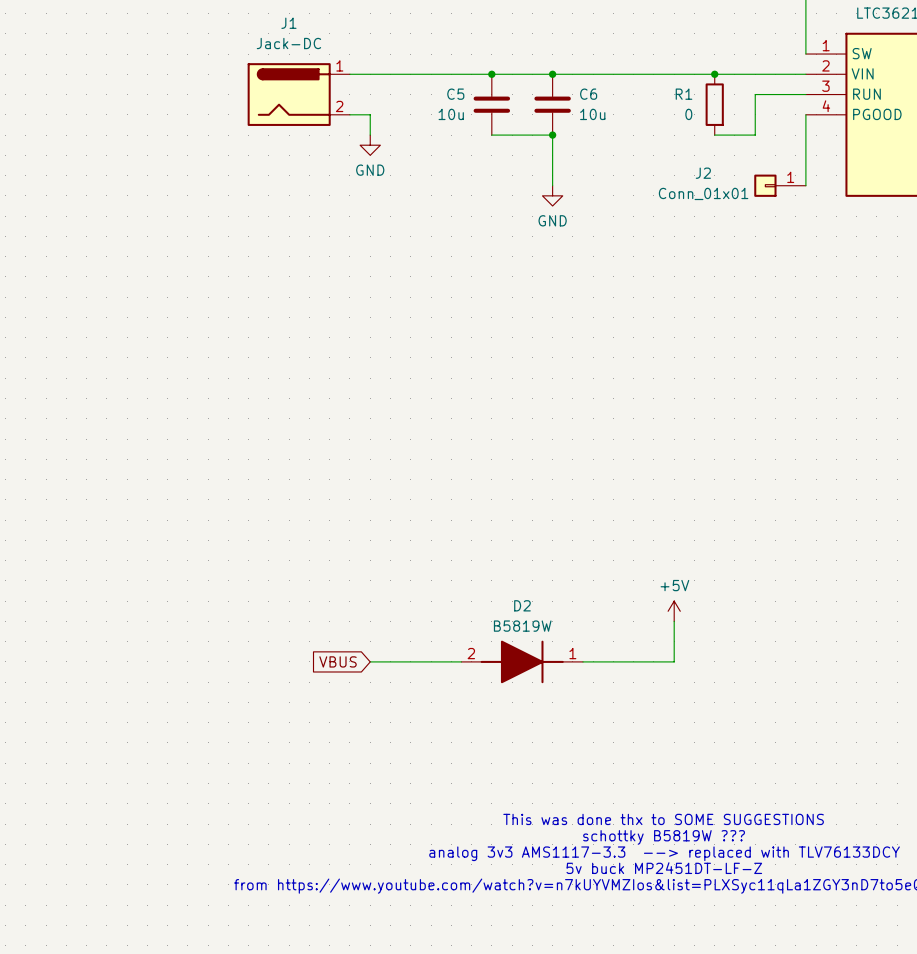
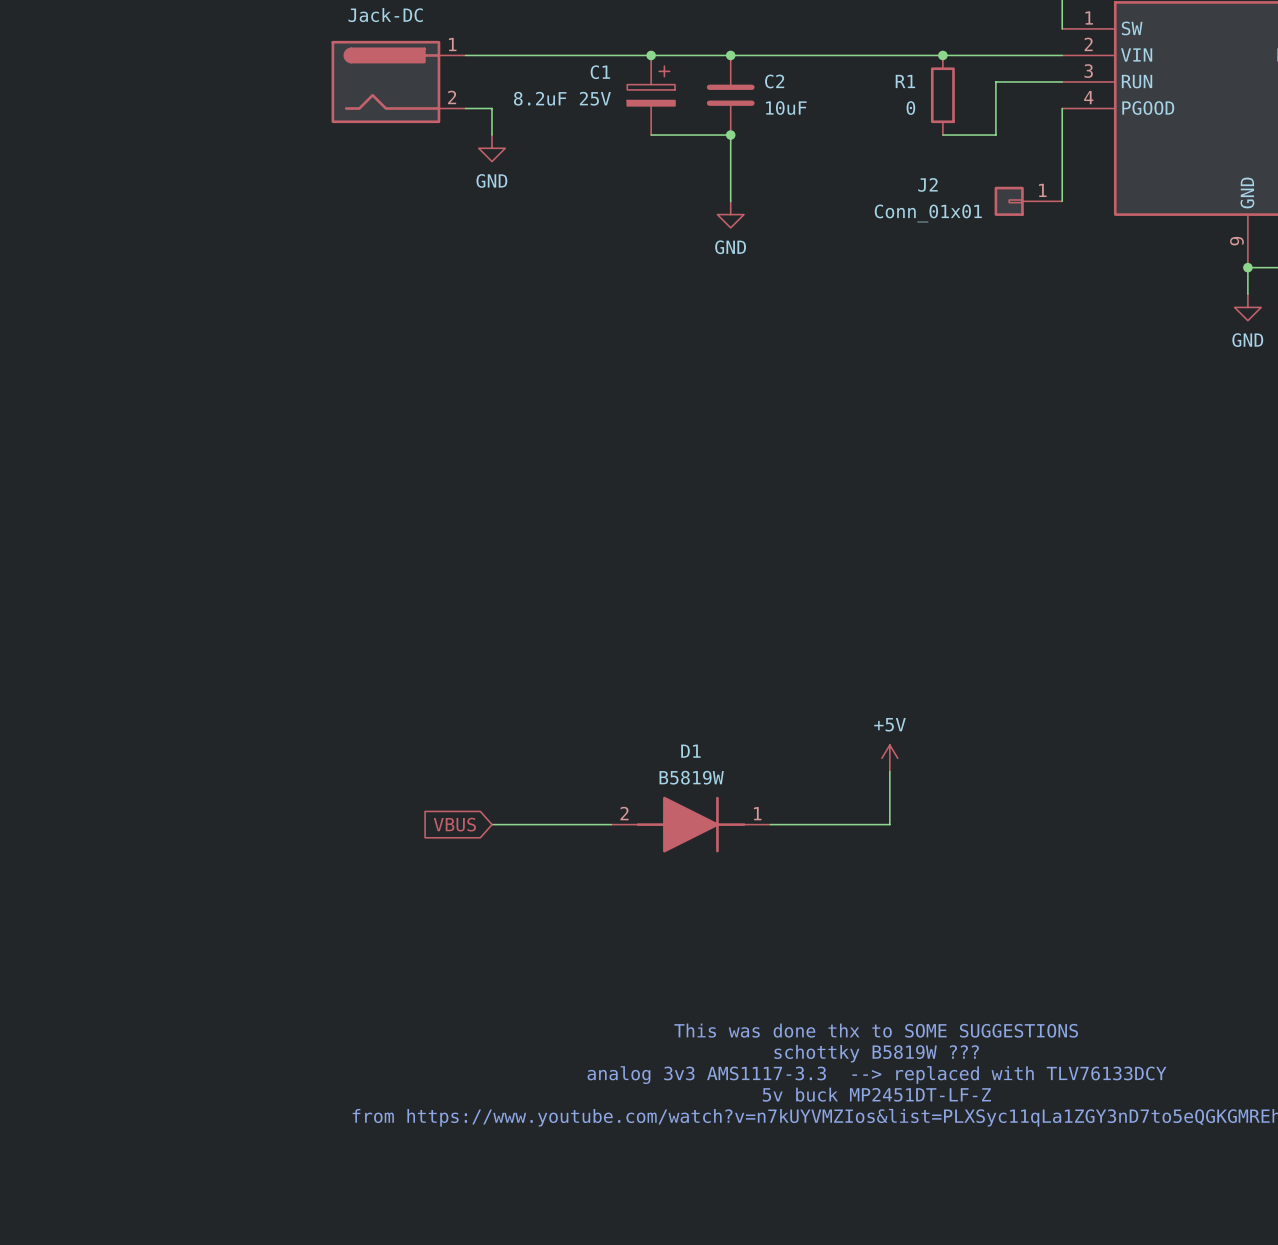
C6 name: C6 (588, 94) -> C2 (774, 81)
C5: 10u (491, 104) -> none
C1: none -> 8.2uF 25V (651, 95)
C6 value: 10u (592, 114) -> 10uF (786, 108)
D2 name: D2 (522, 605) -> D1 (690, 751)

